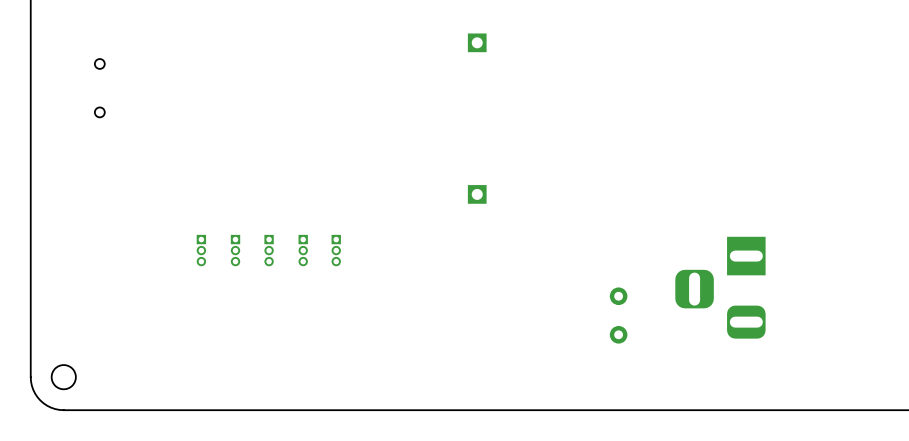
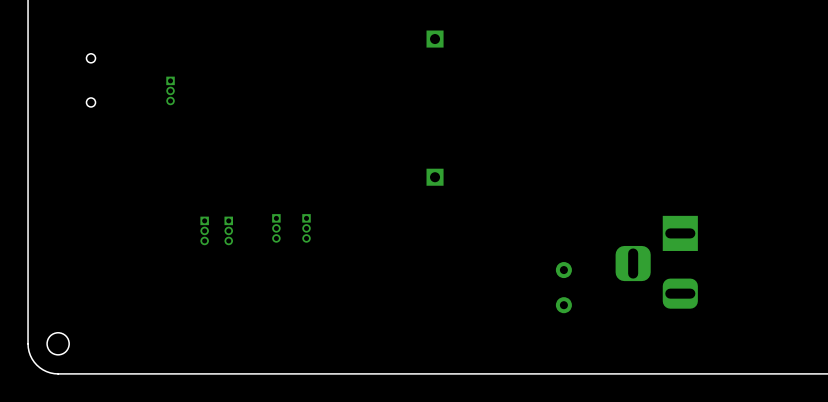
part: none -> (170, 90)
part: (201, 250) -> none
part: (235, 250) -> none
part: (269, 250) -> none
part: none -> (204, 230)
part: none -> (228, 230)

